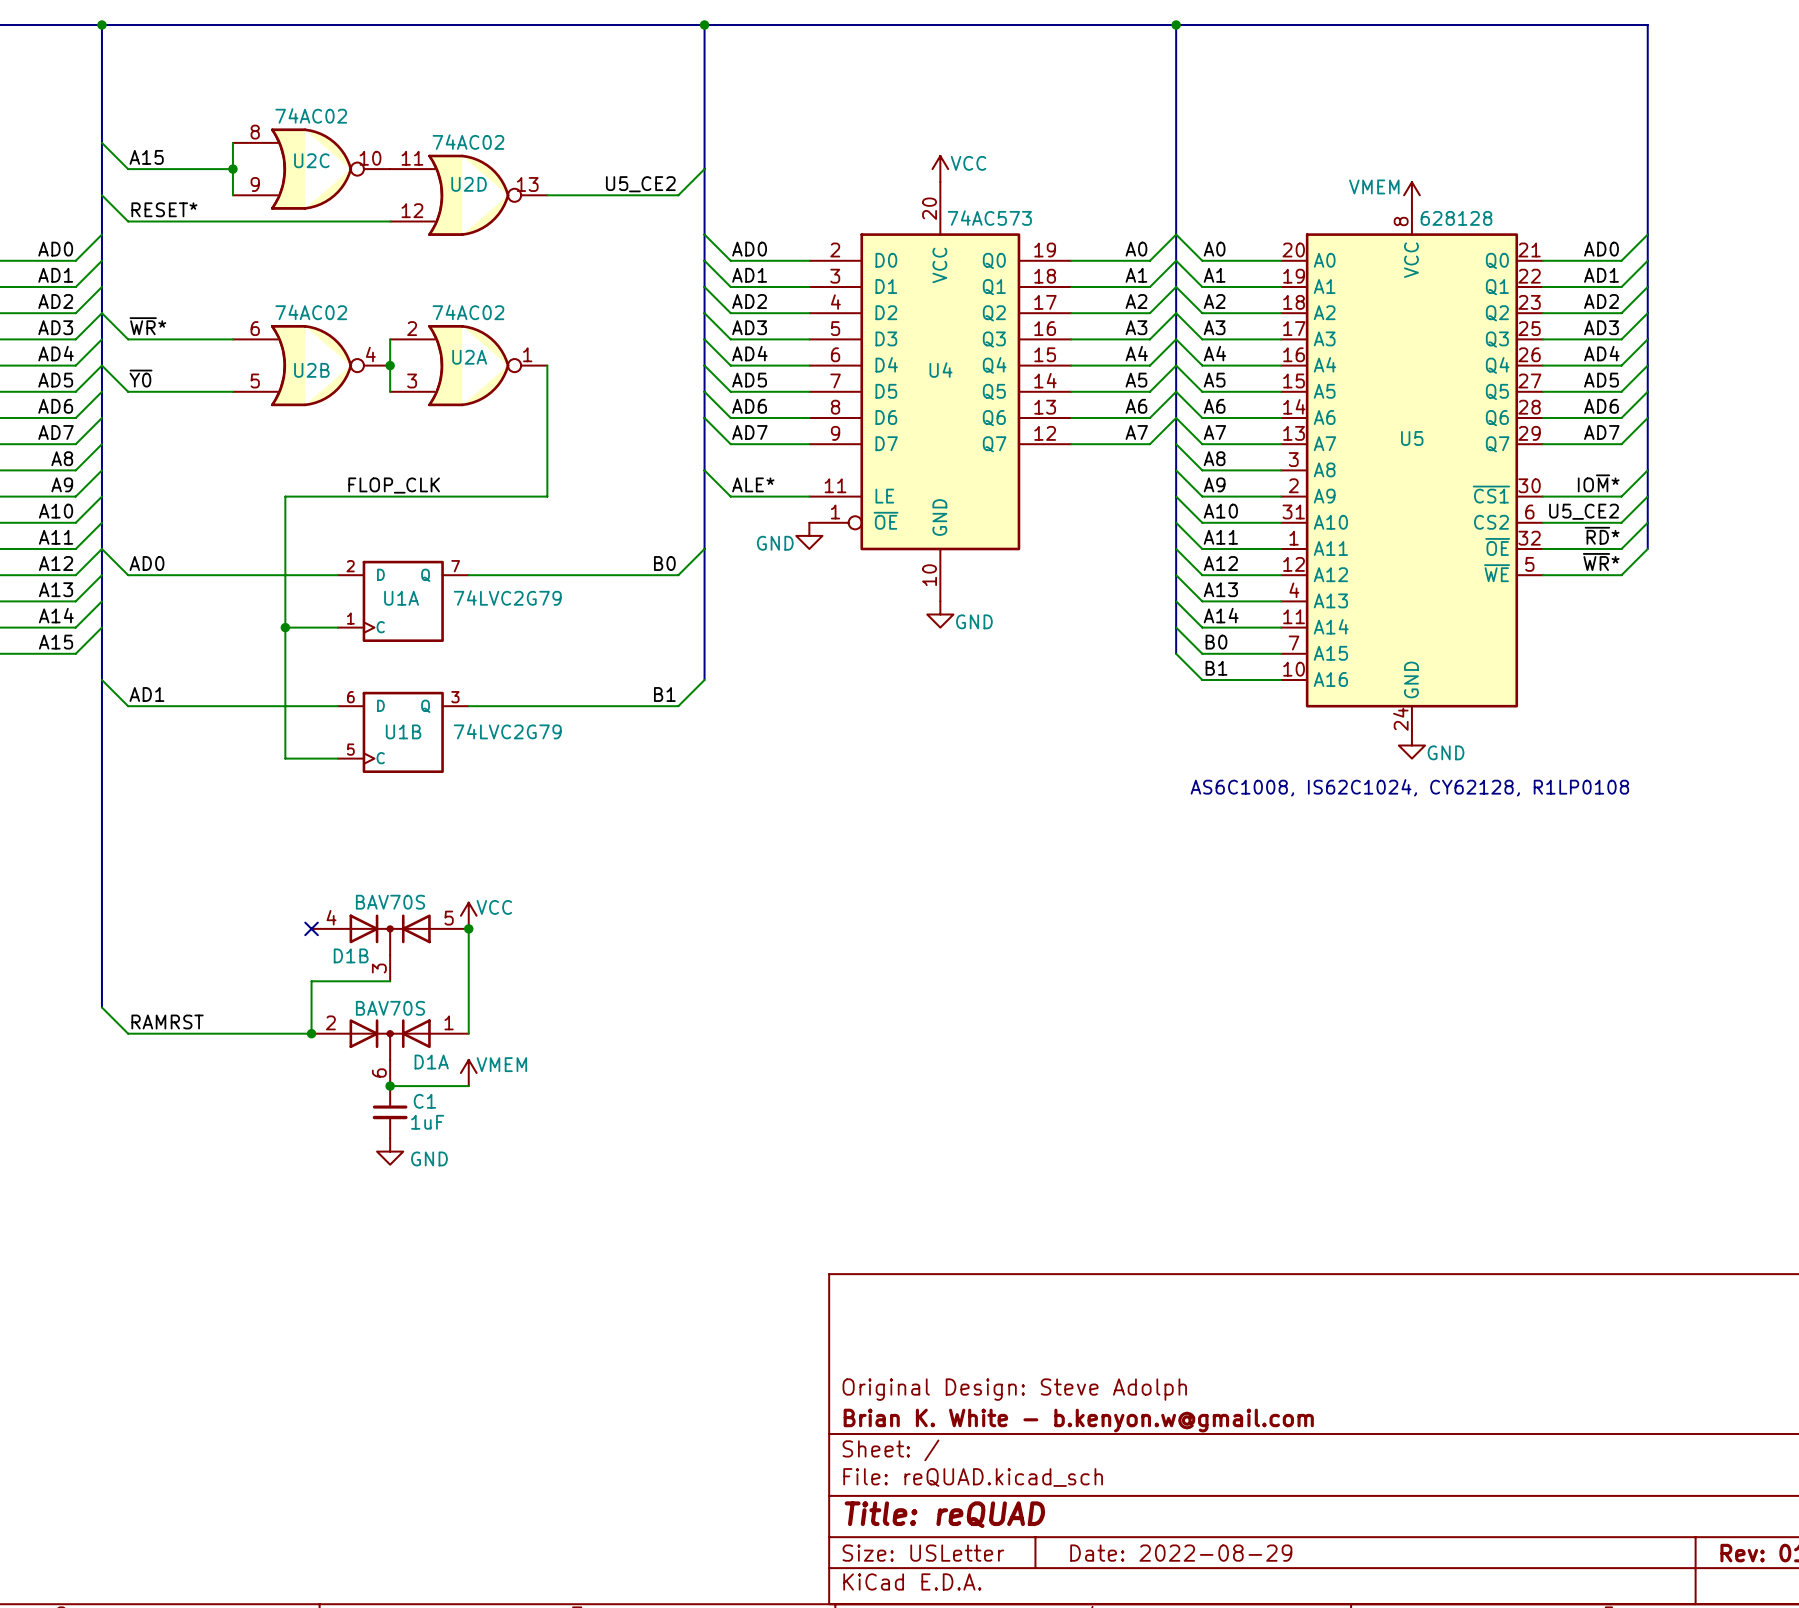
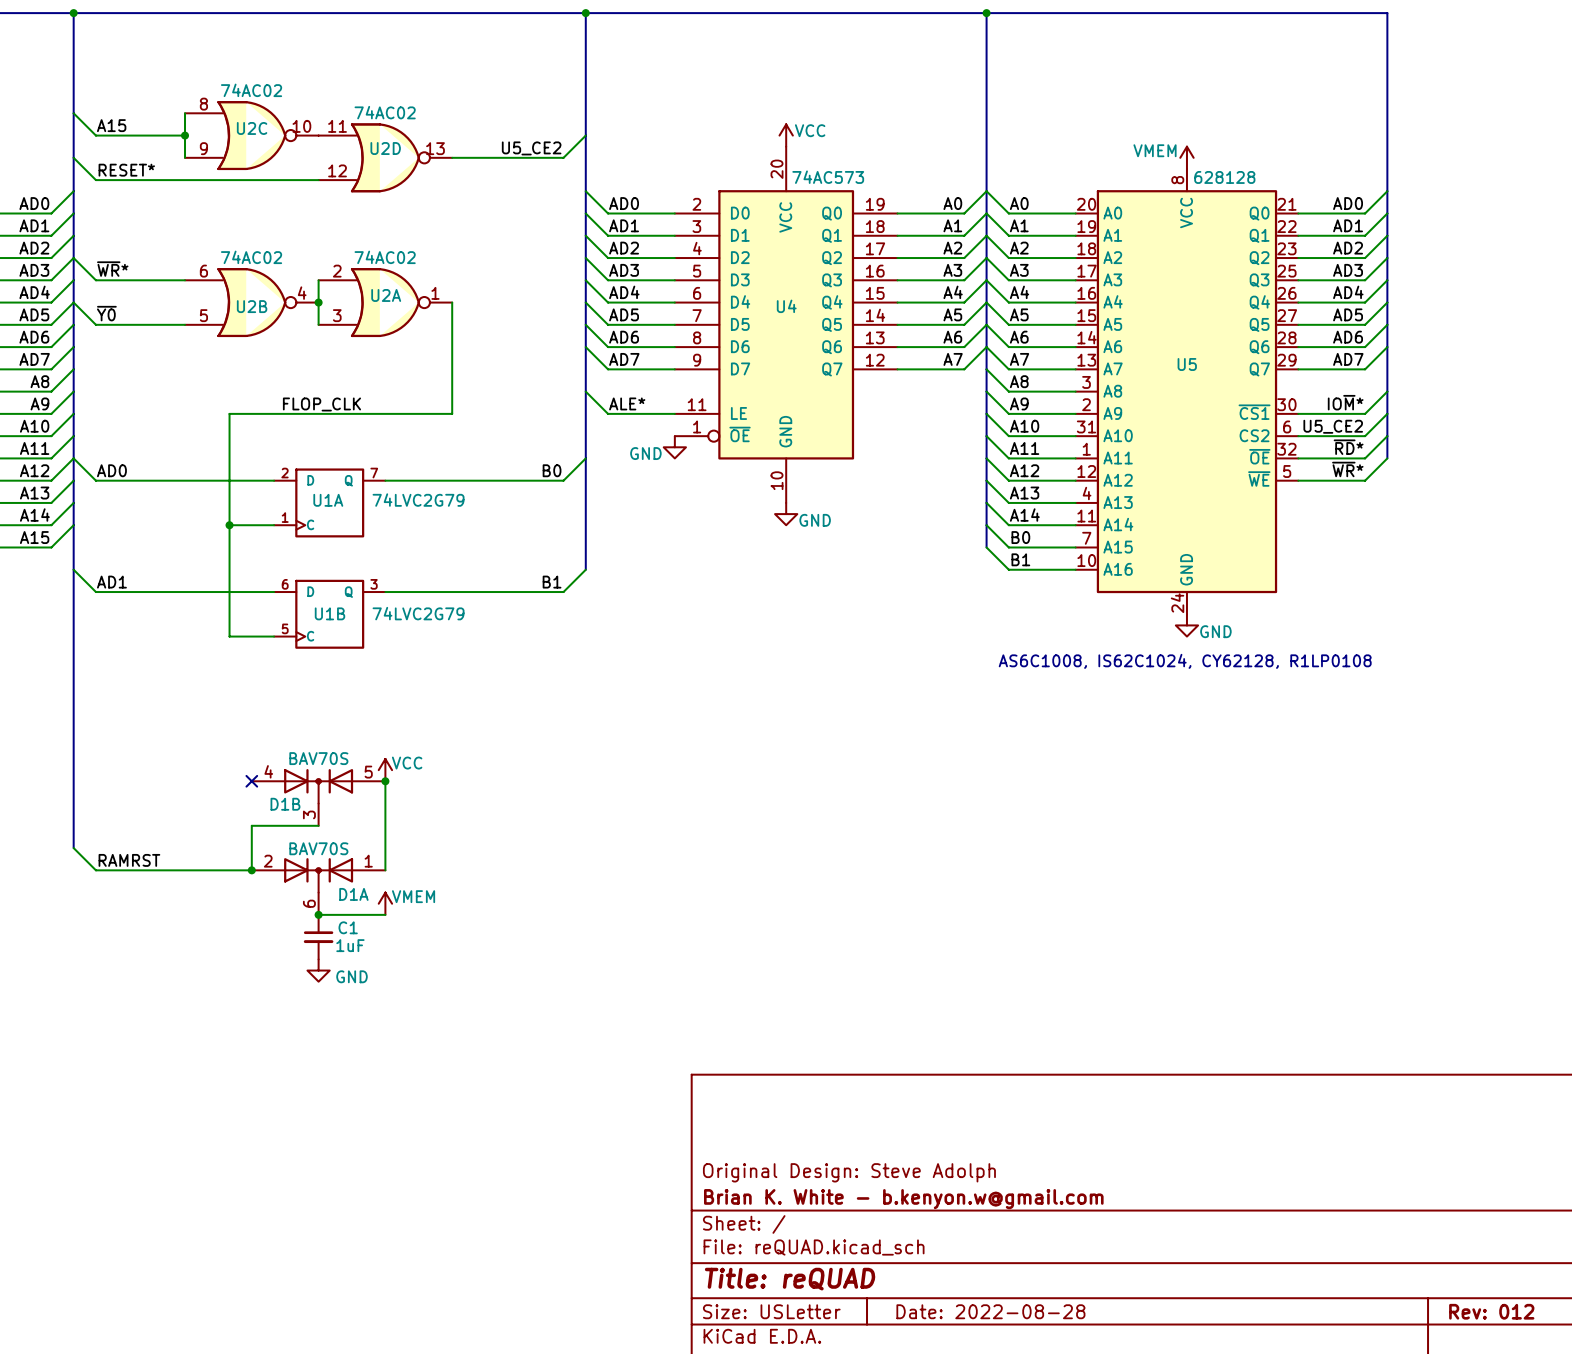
title block: Date: 2022-08-29 (1181, 1553) -> Date: 2022-08-28 (990, 1311)

